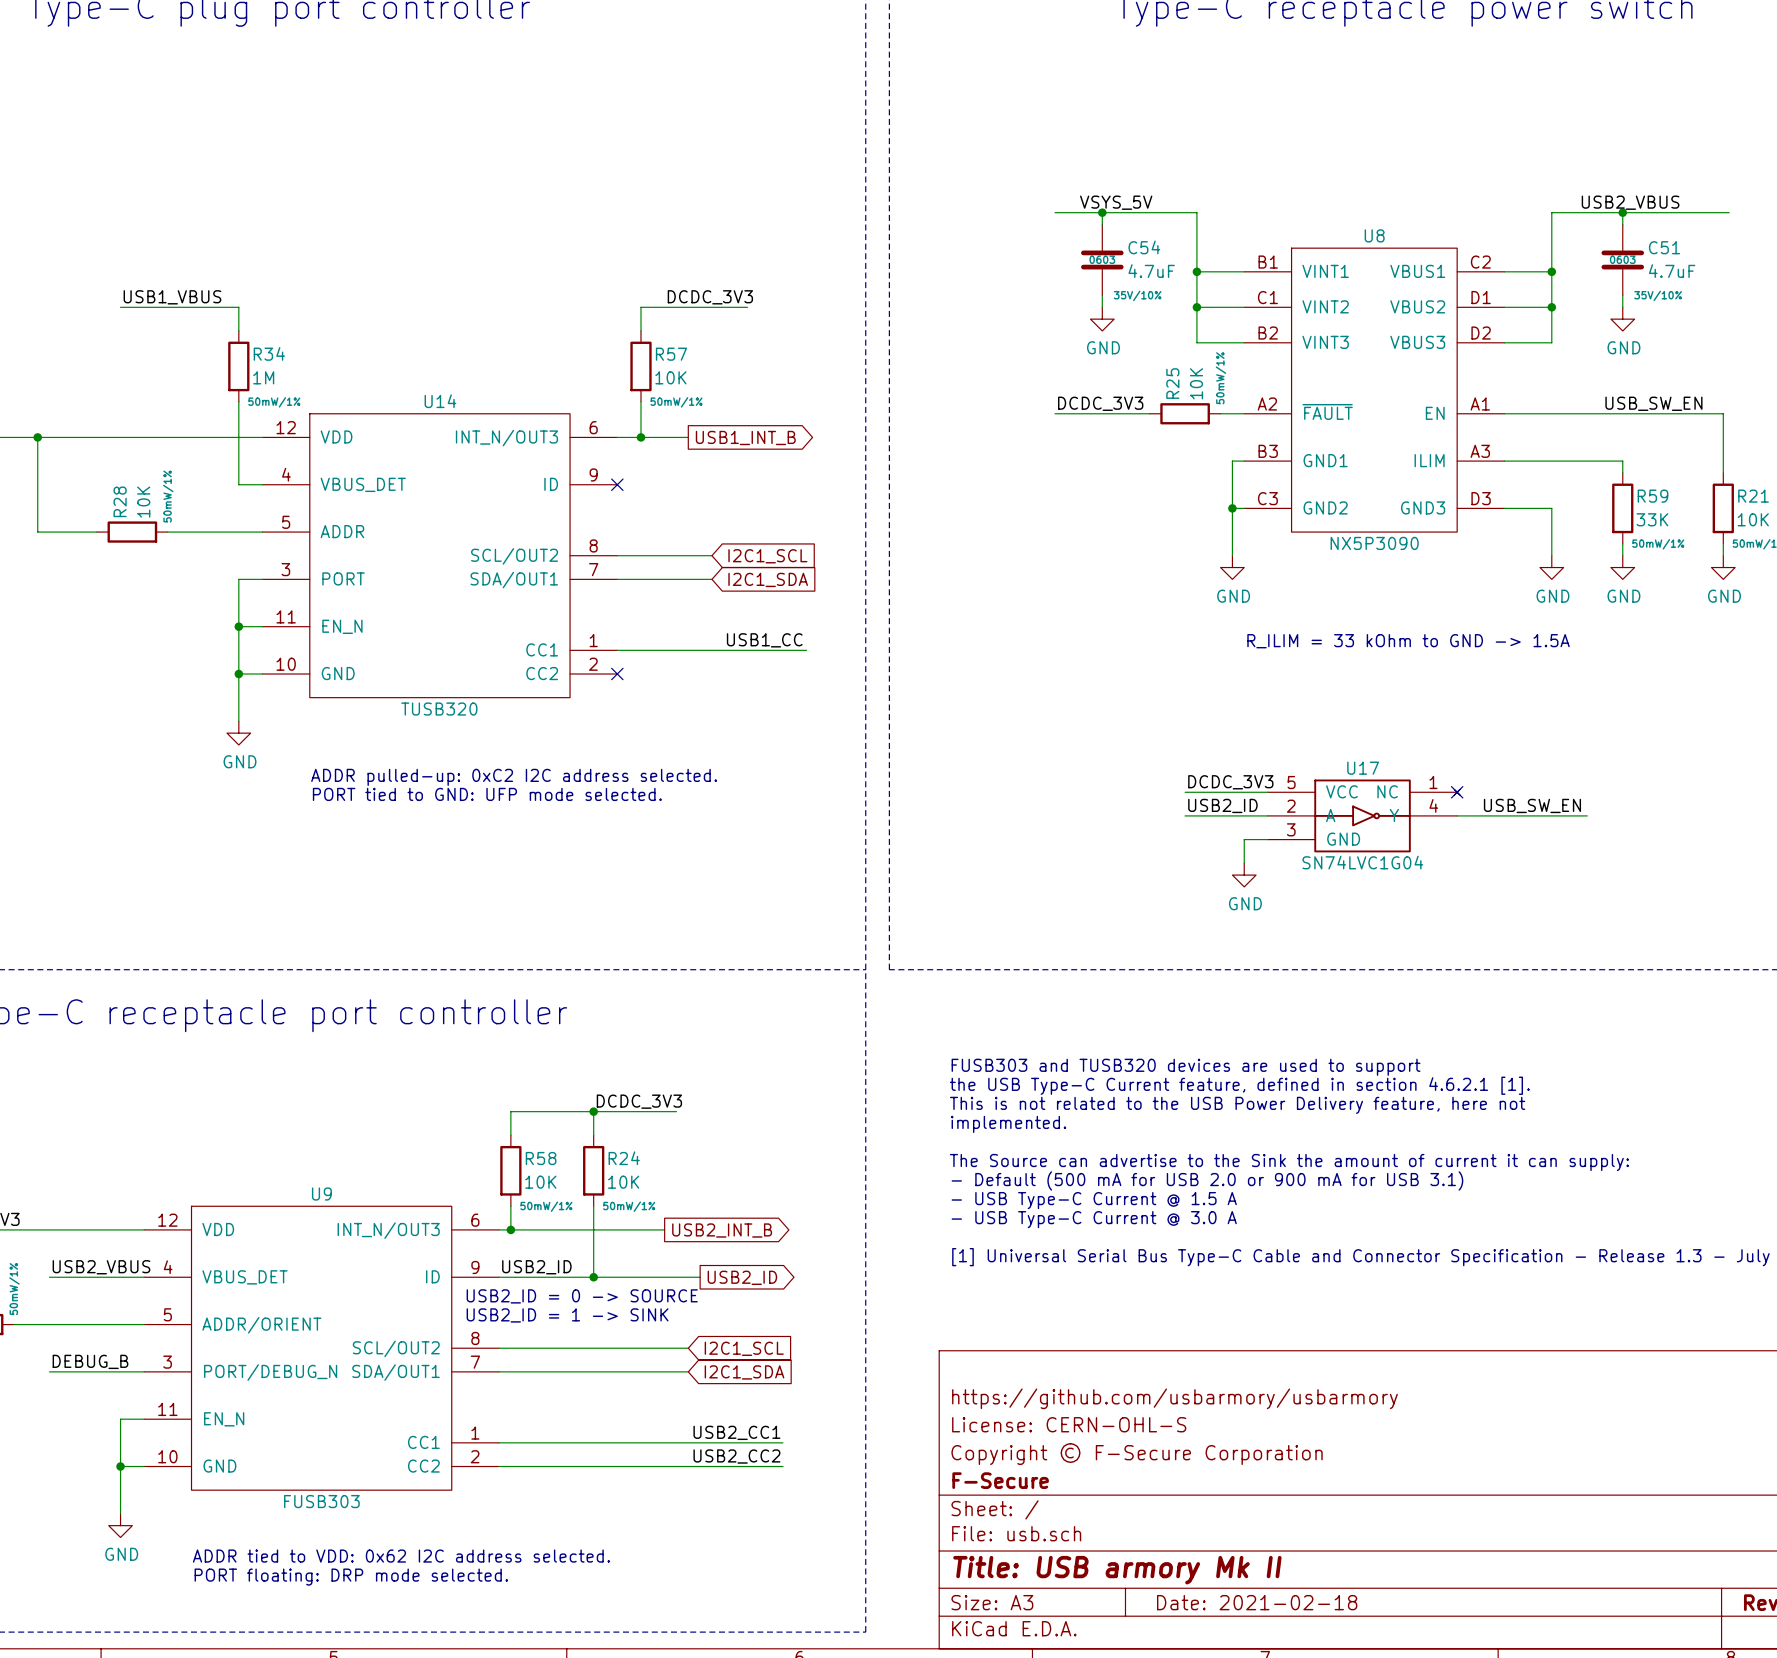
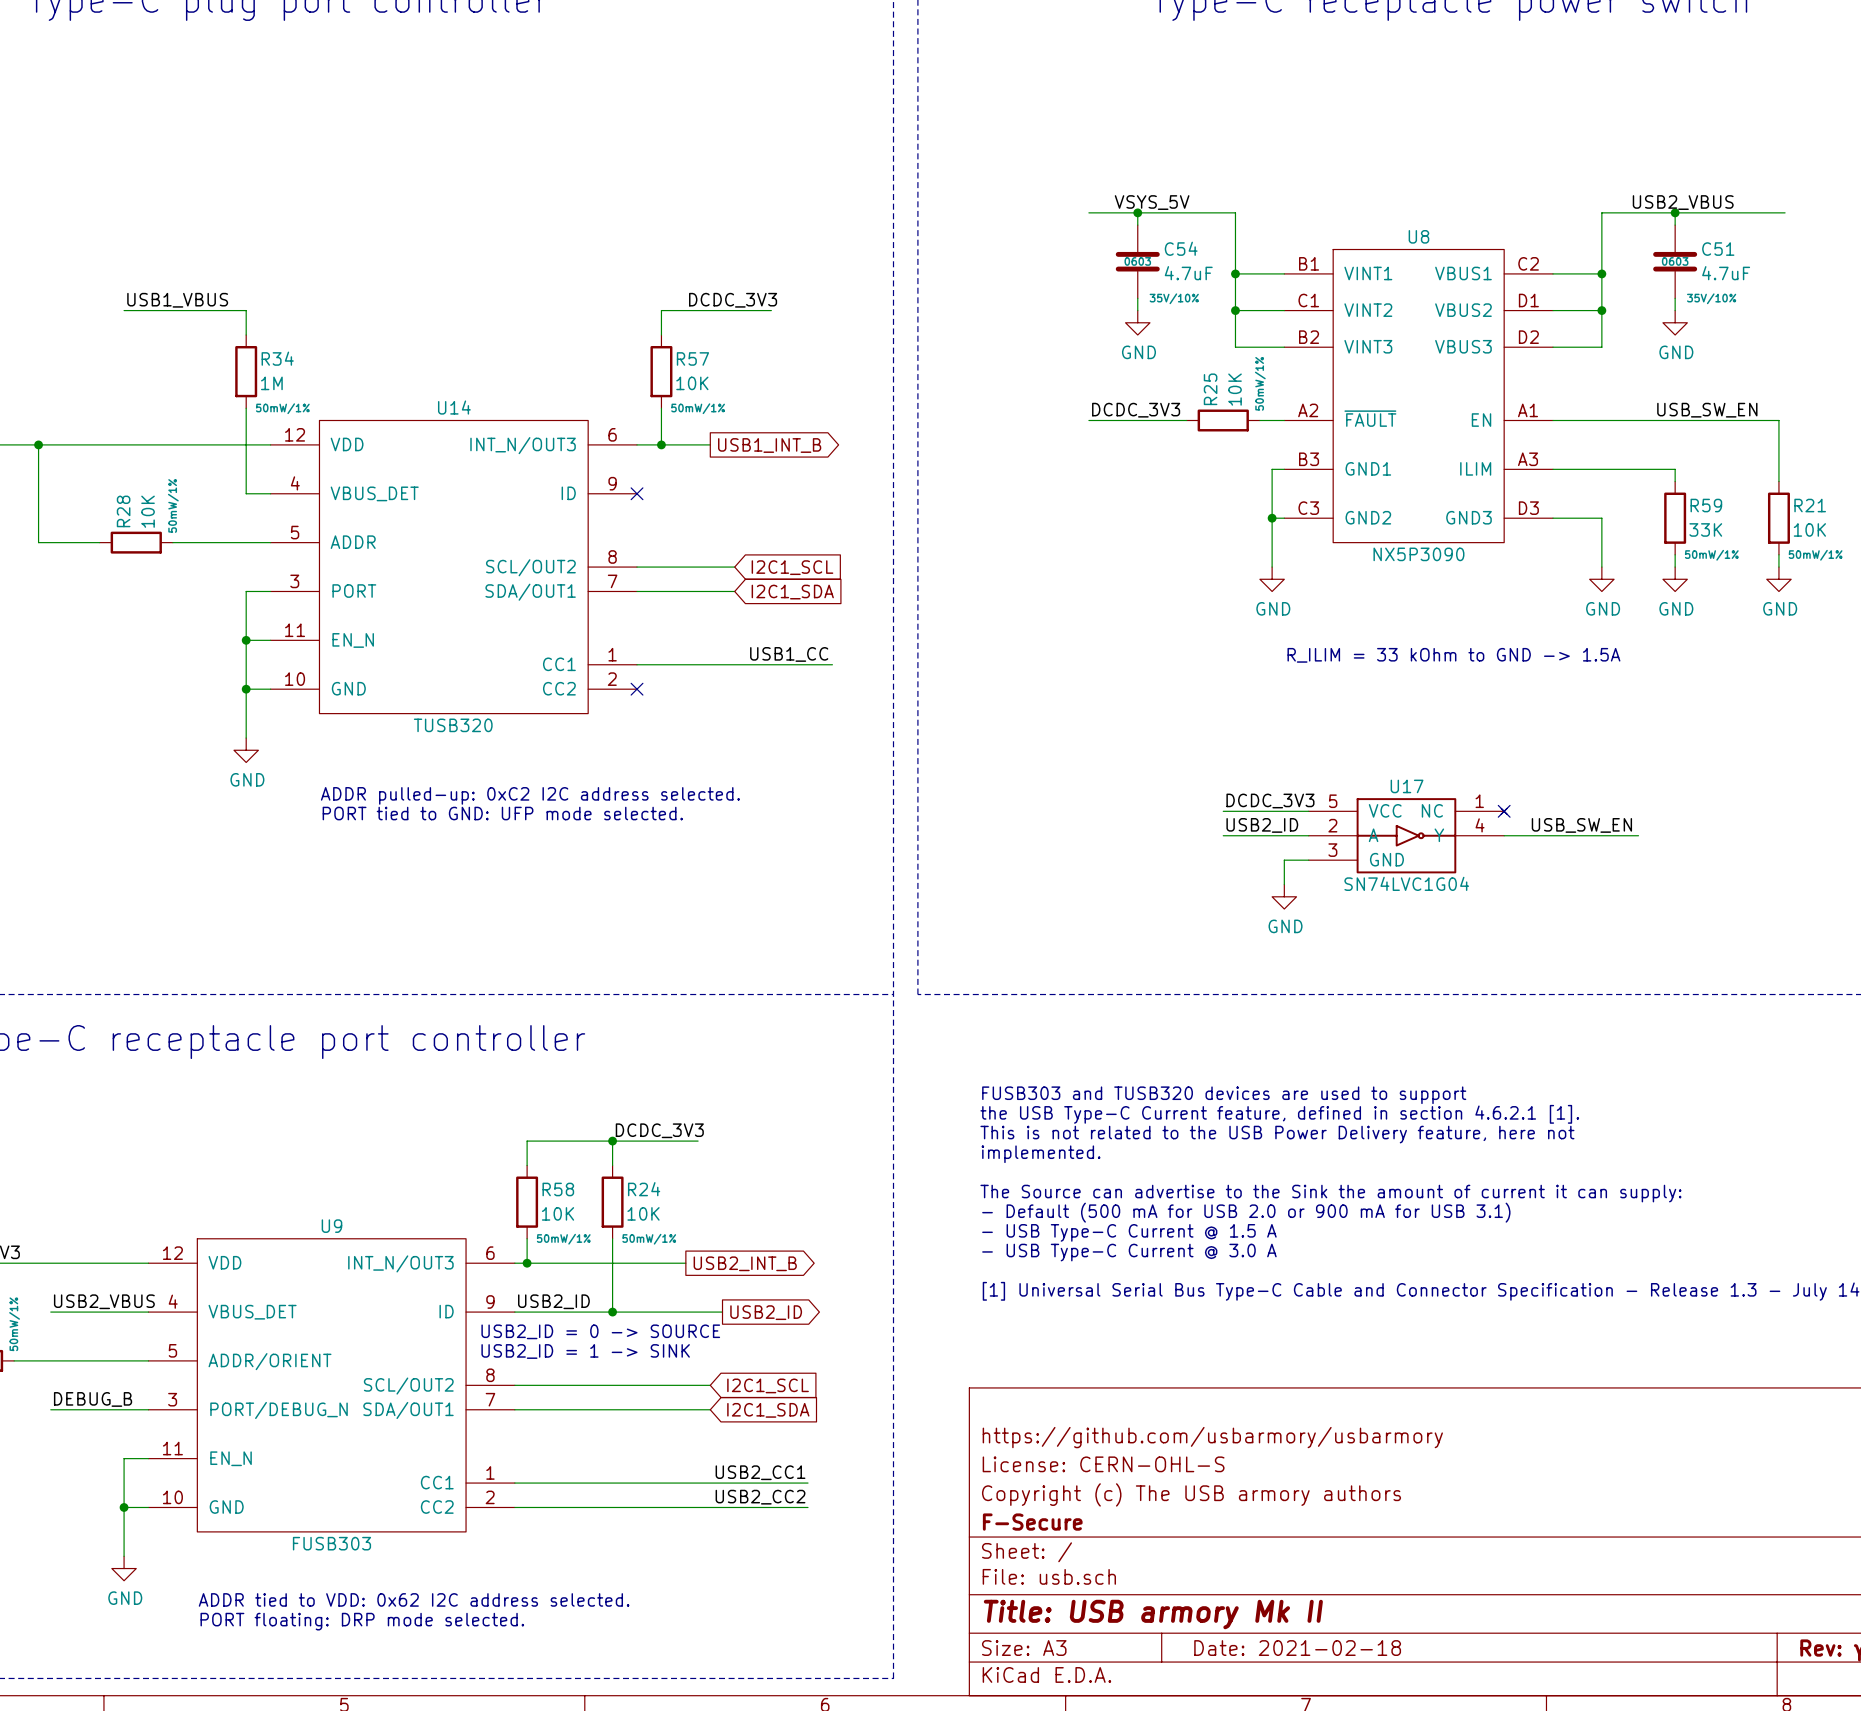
title block: Copyright © F-Secure Corporation (1137, 1454) -> Copyright (c) The USB armory authors (1191, 1494)

